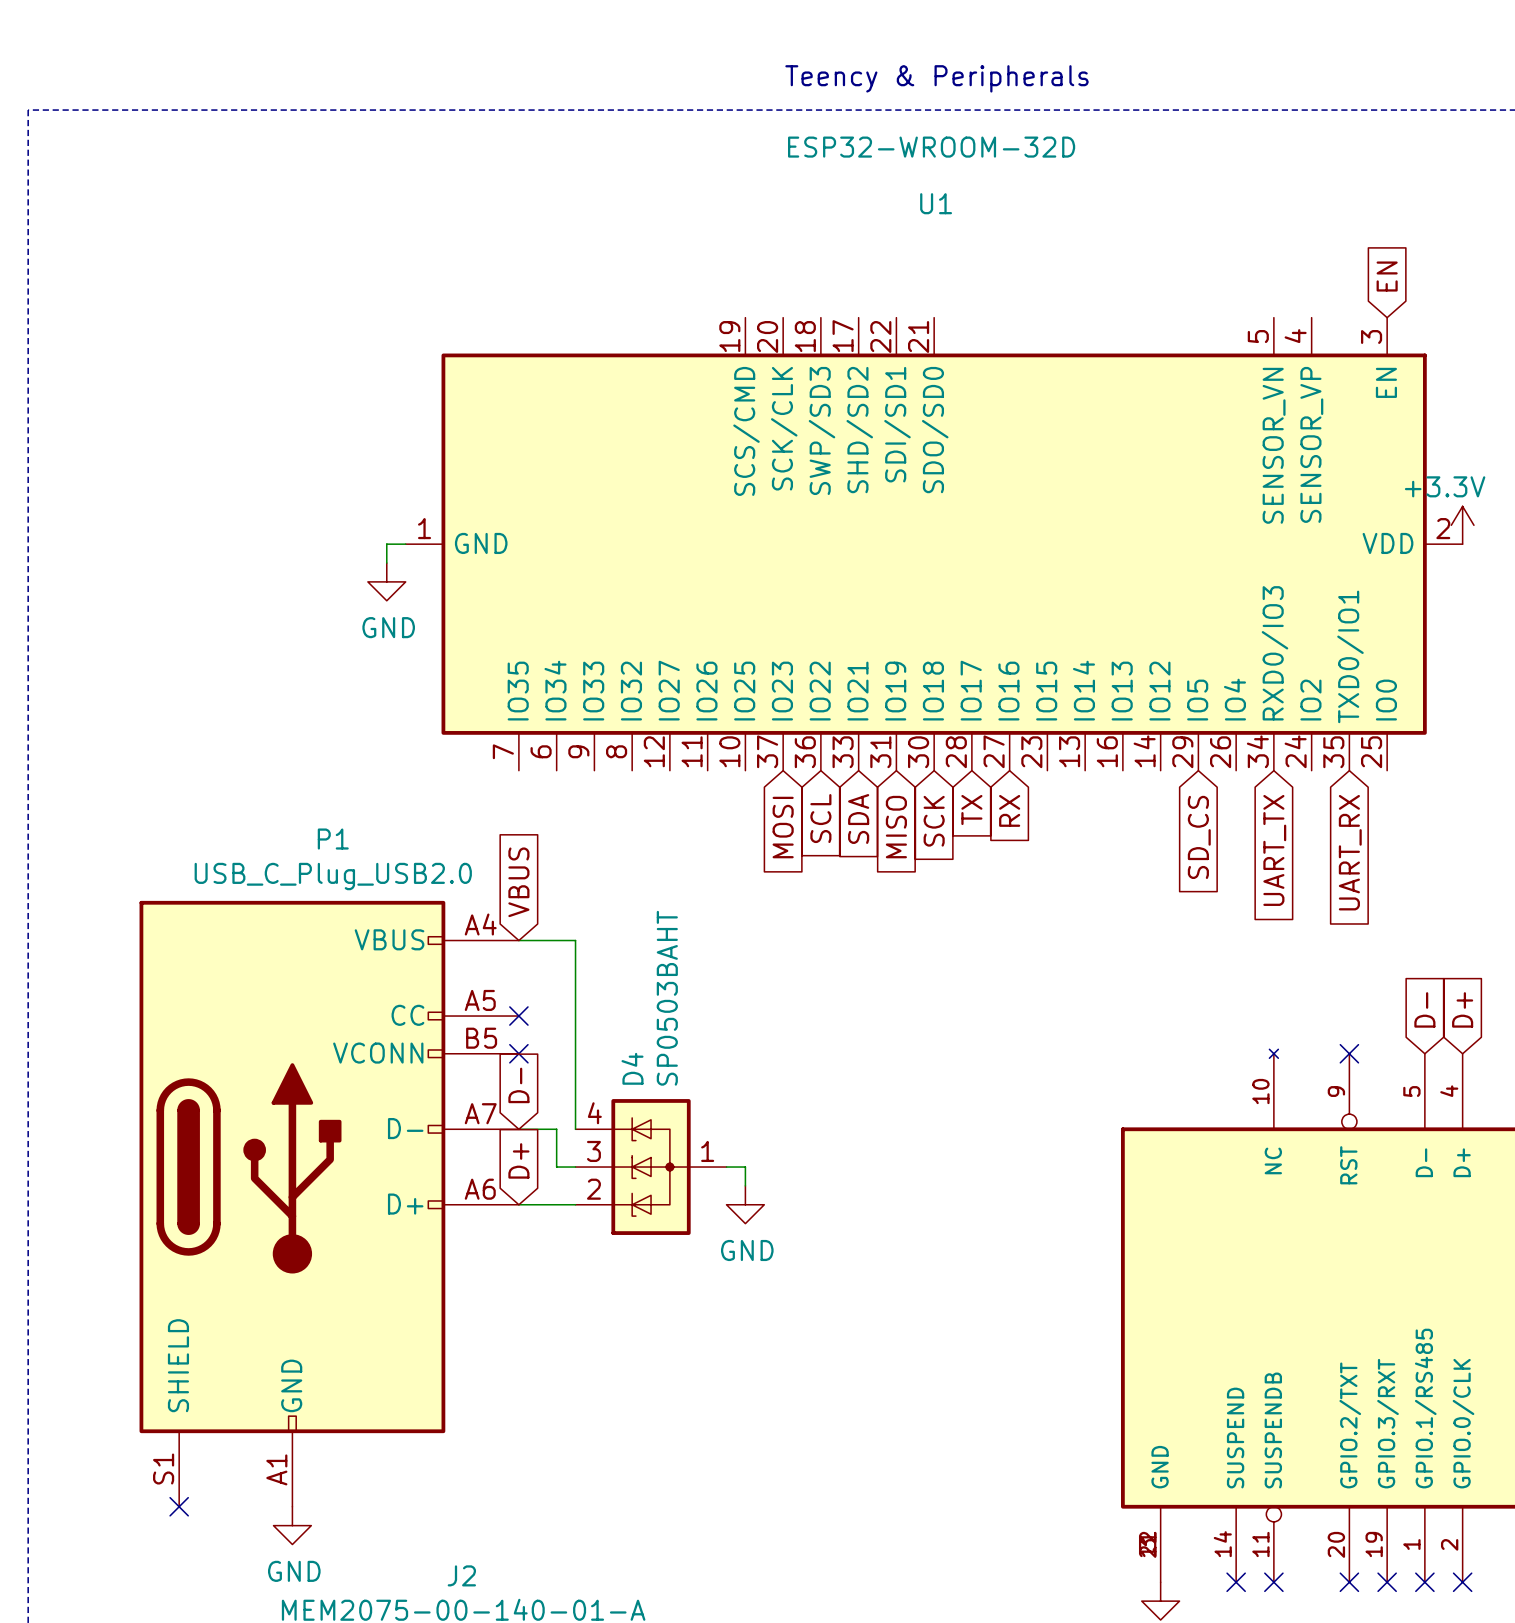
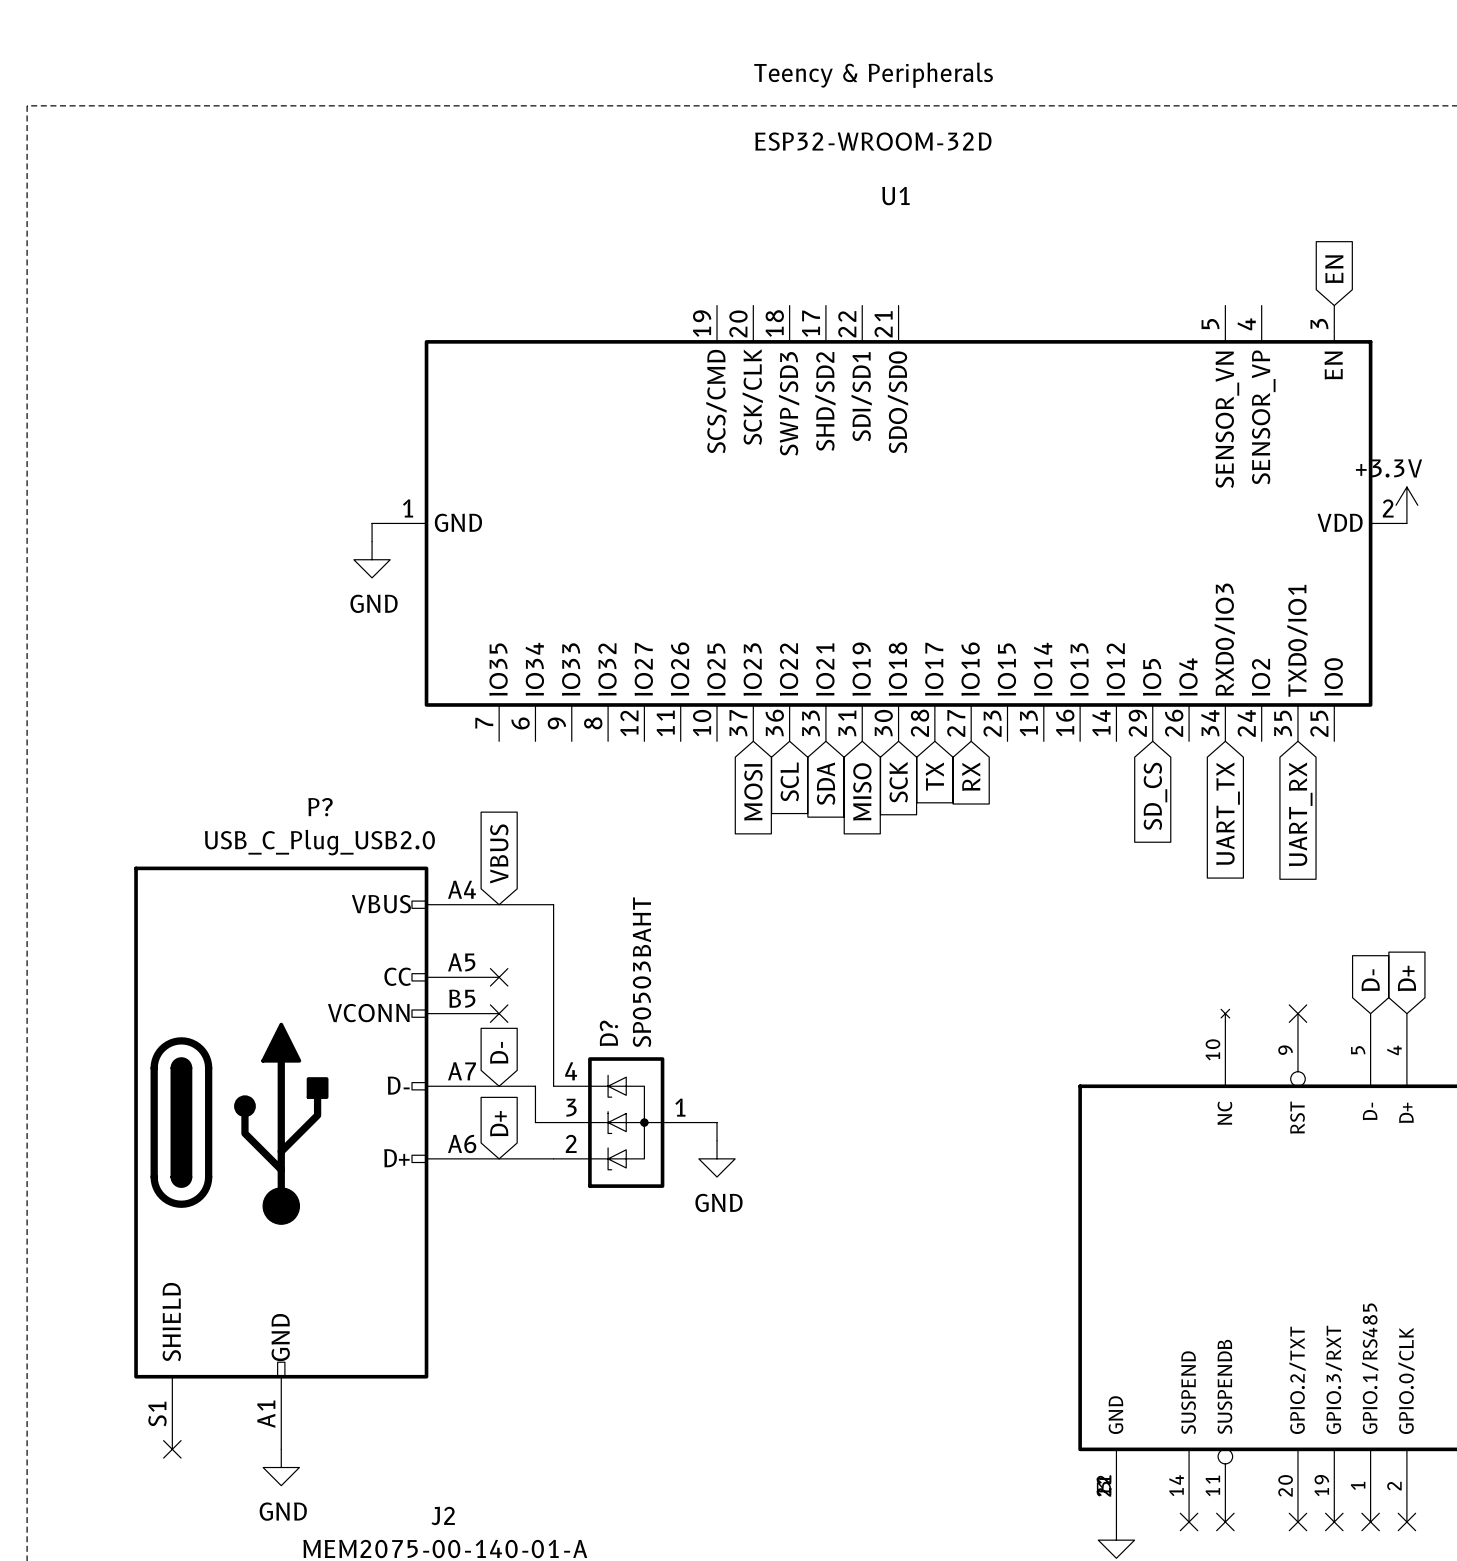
P1 name: P1 (333, 839) -> P? (320, 807)
D4 name: D4 (632, 1068) -> D? (608, 1033)

